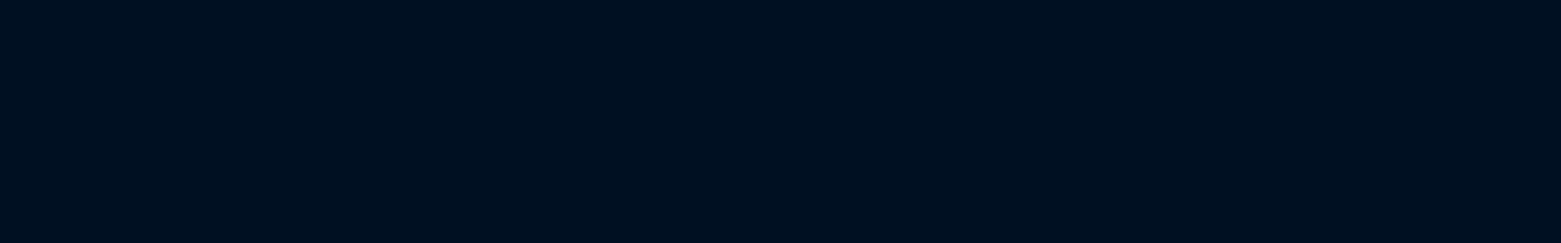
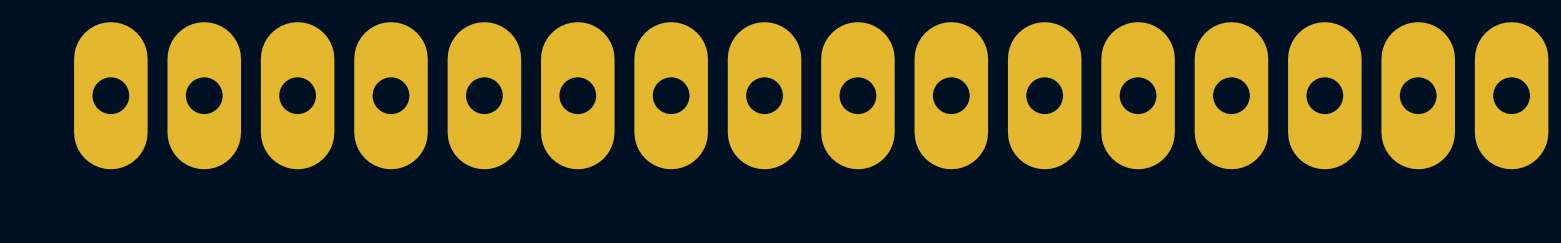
part: none -> (811, 95)

